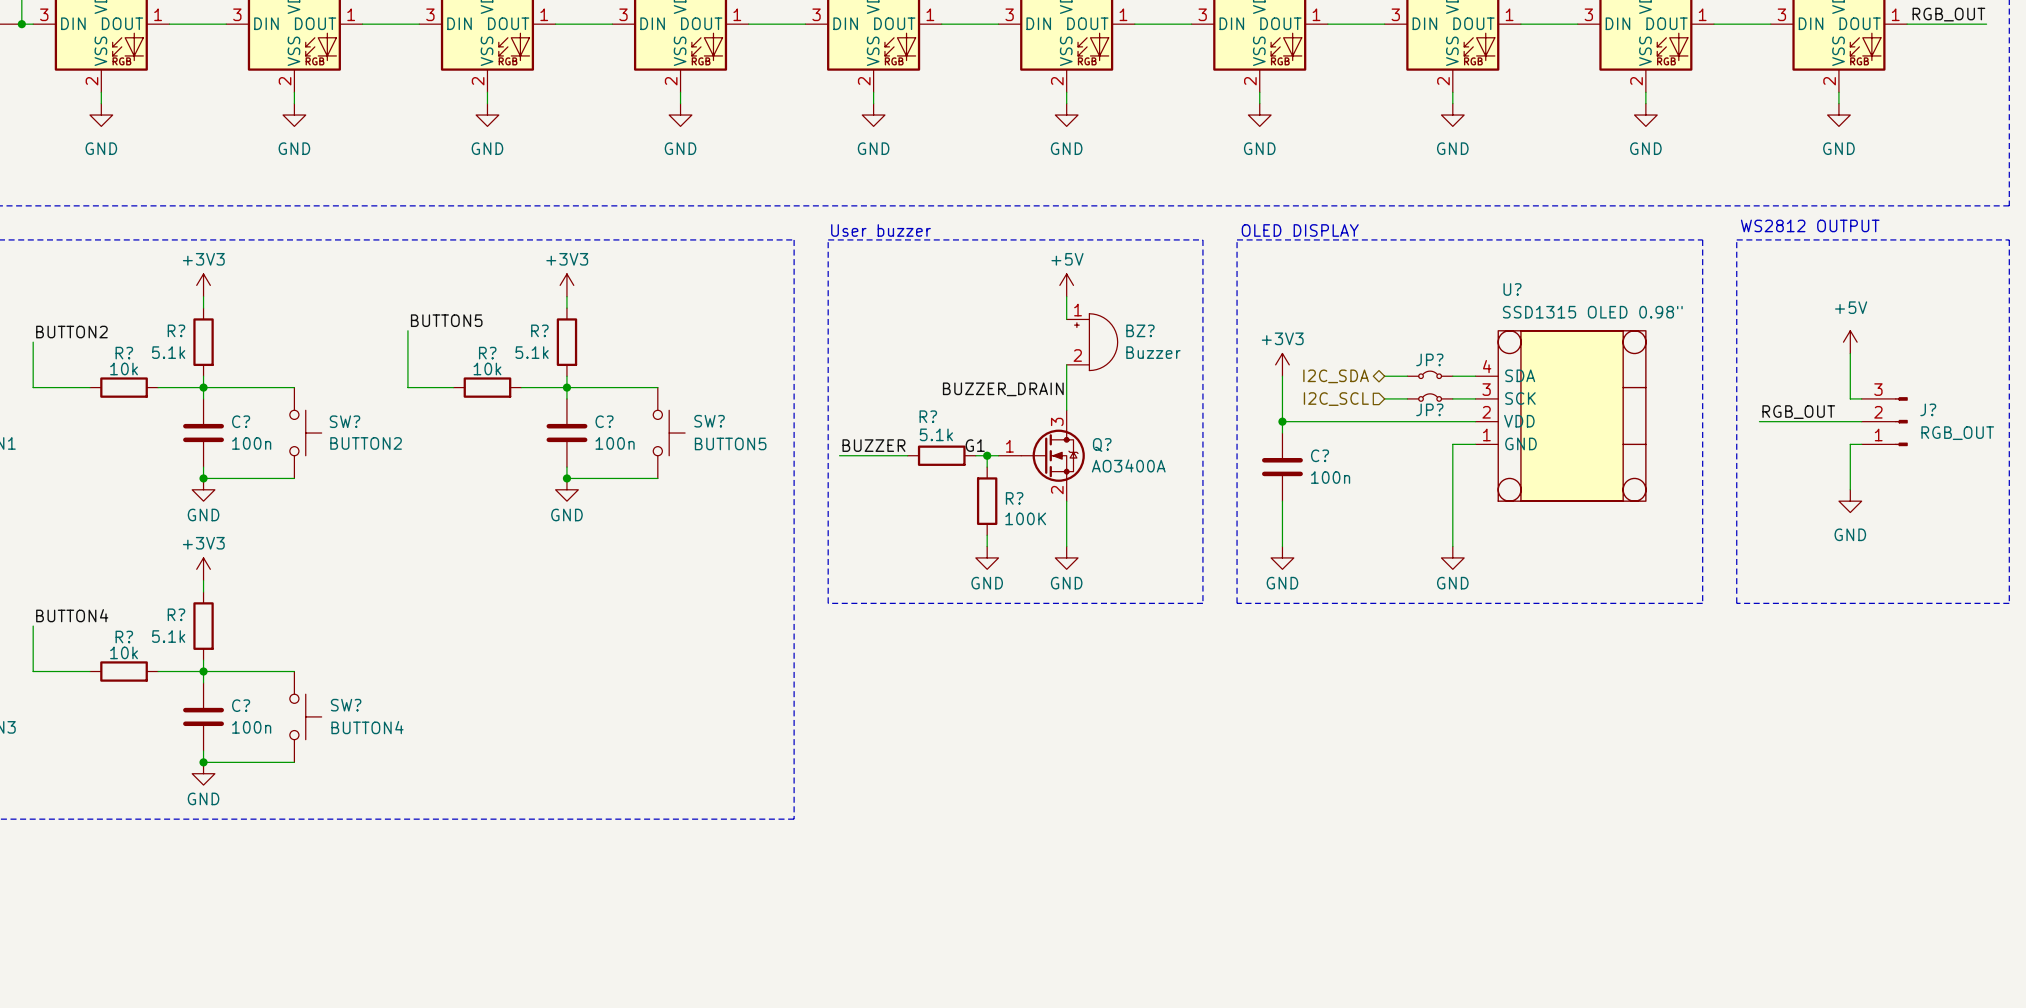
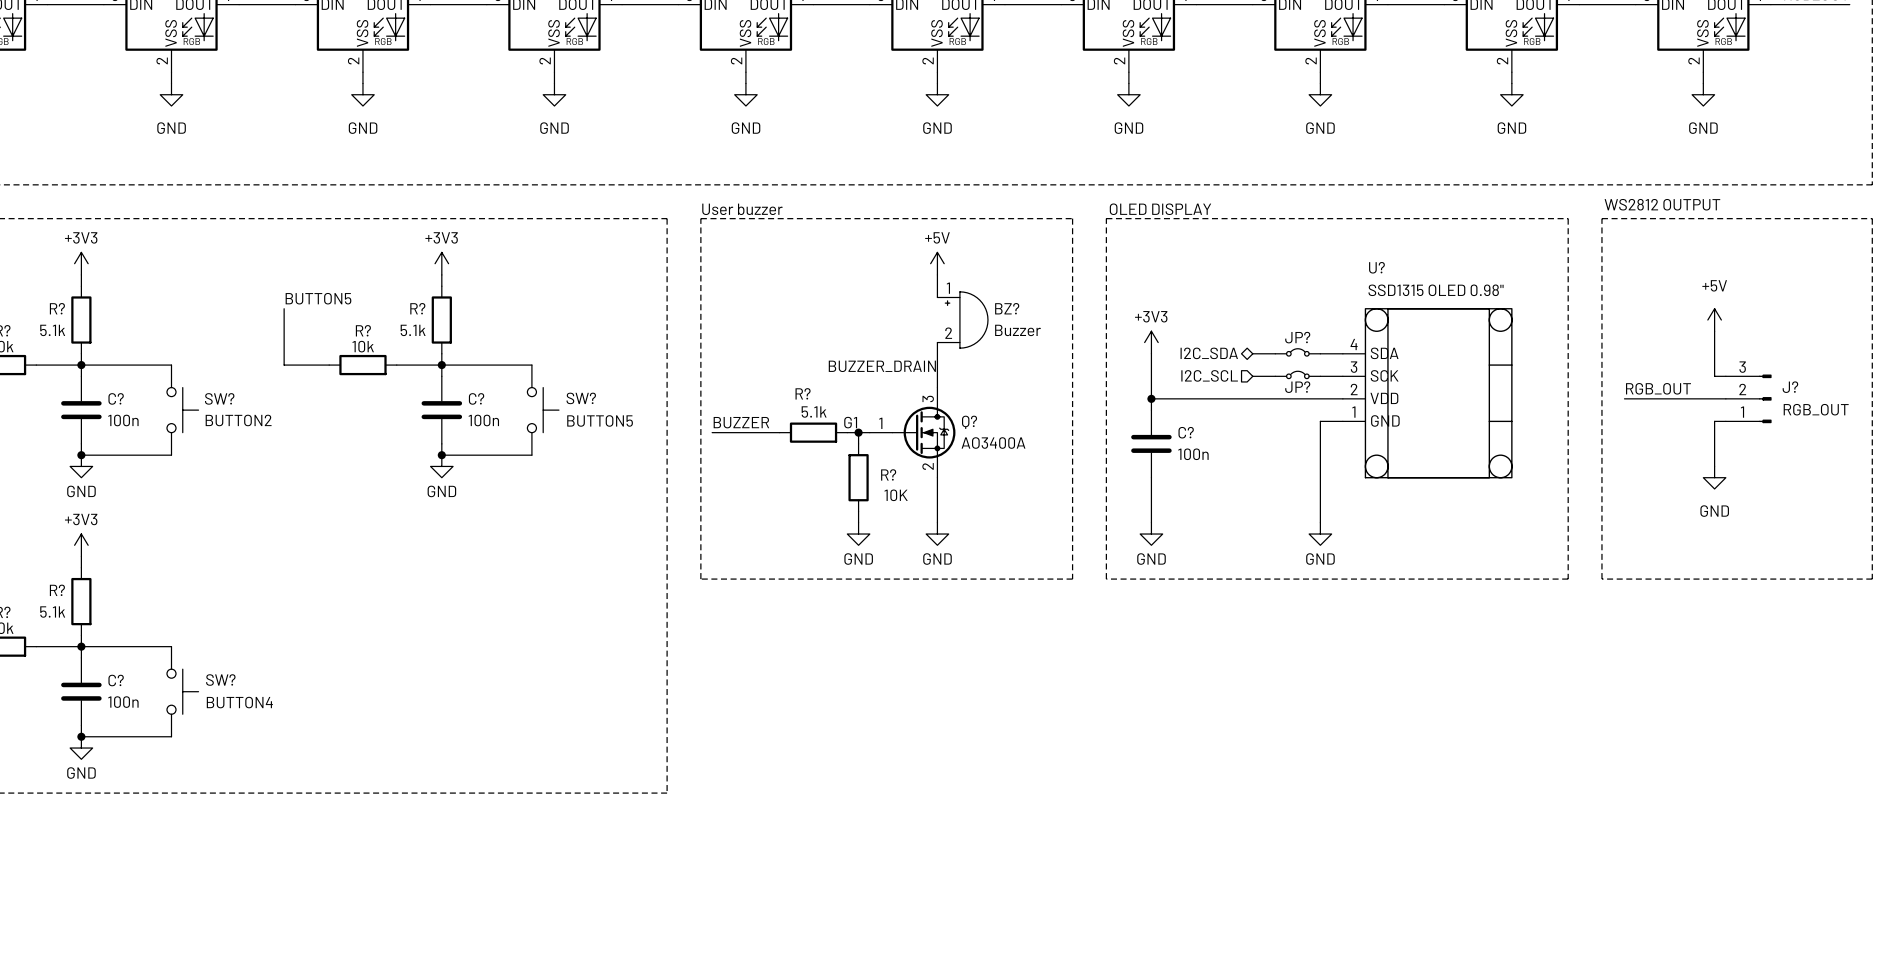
R? value: 100K (1025, 518) -> 10K (896, 495)

